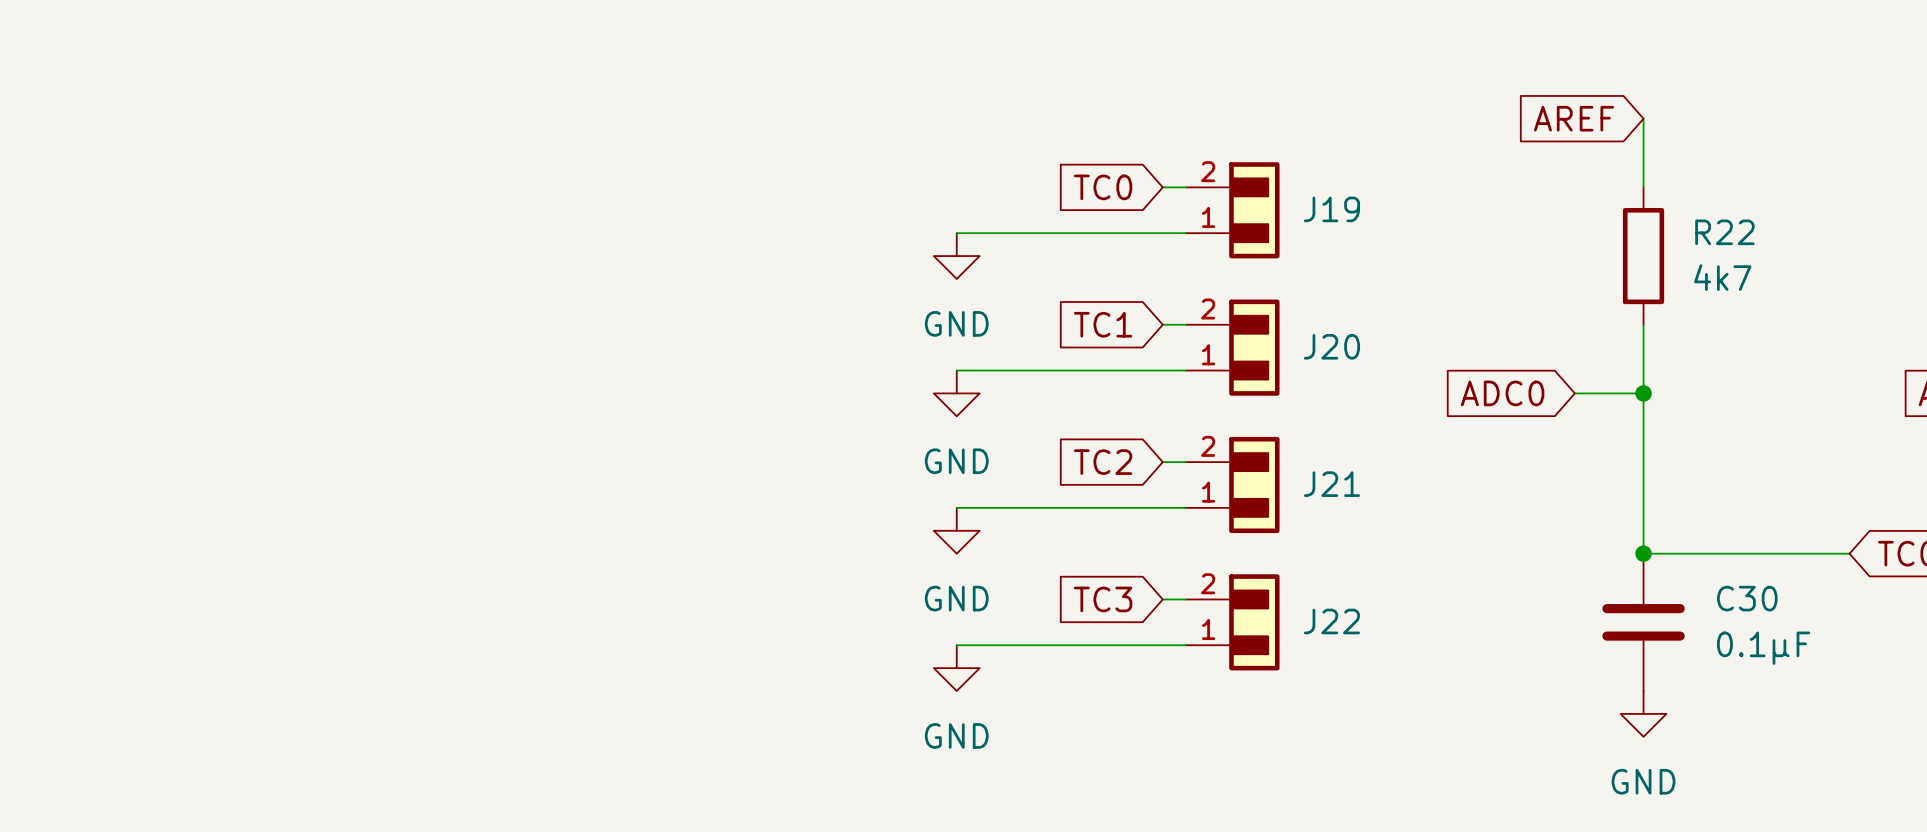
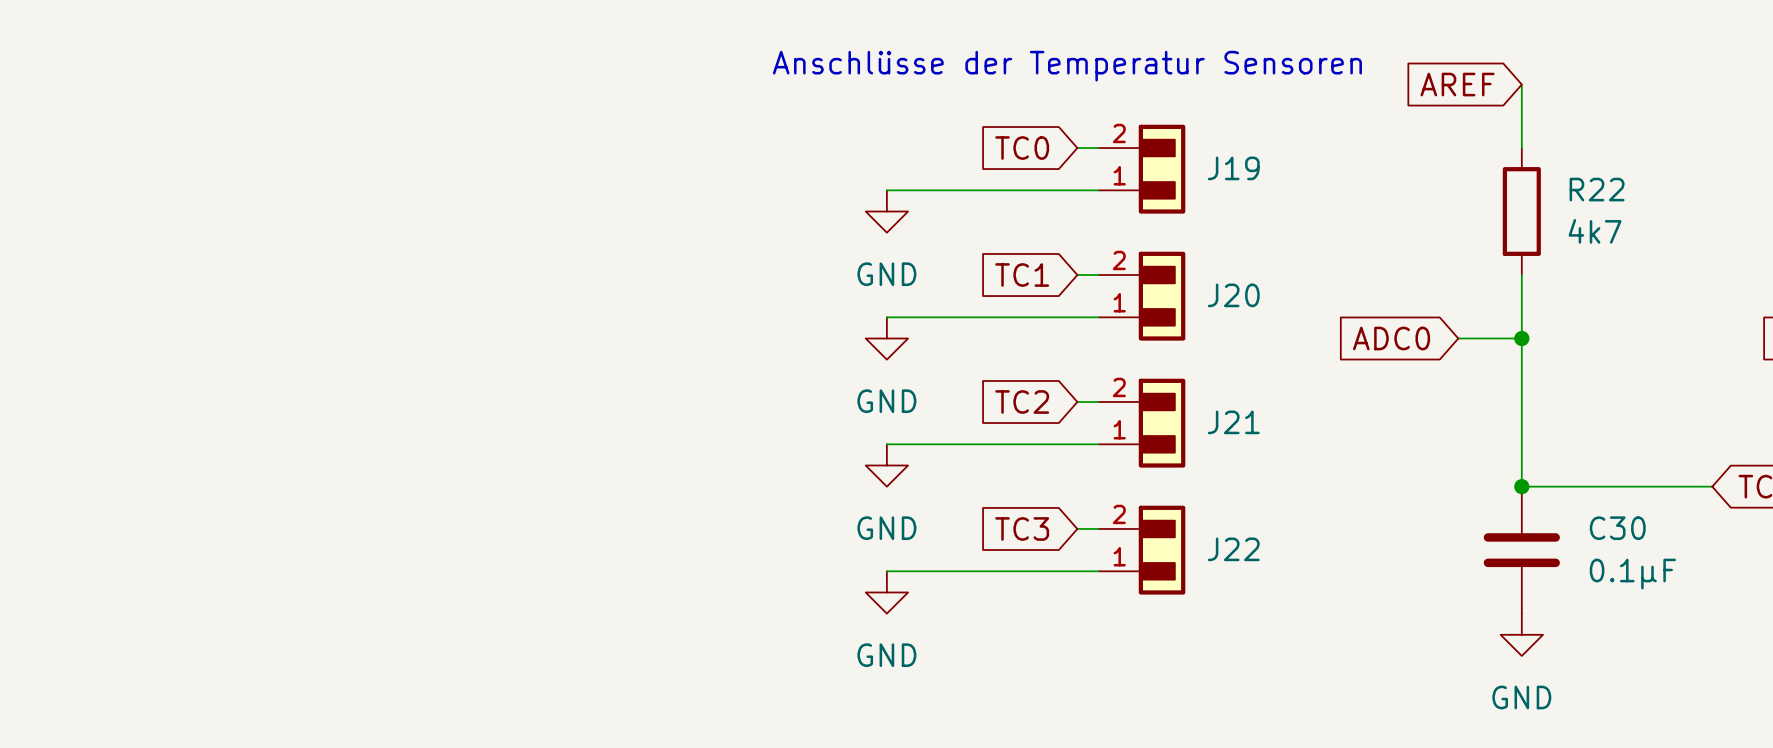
text: none -> Anschlüsse der Temperatur Sensoren (1067, 66)

